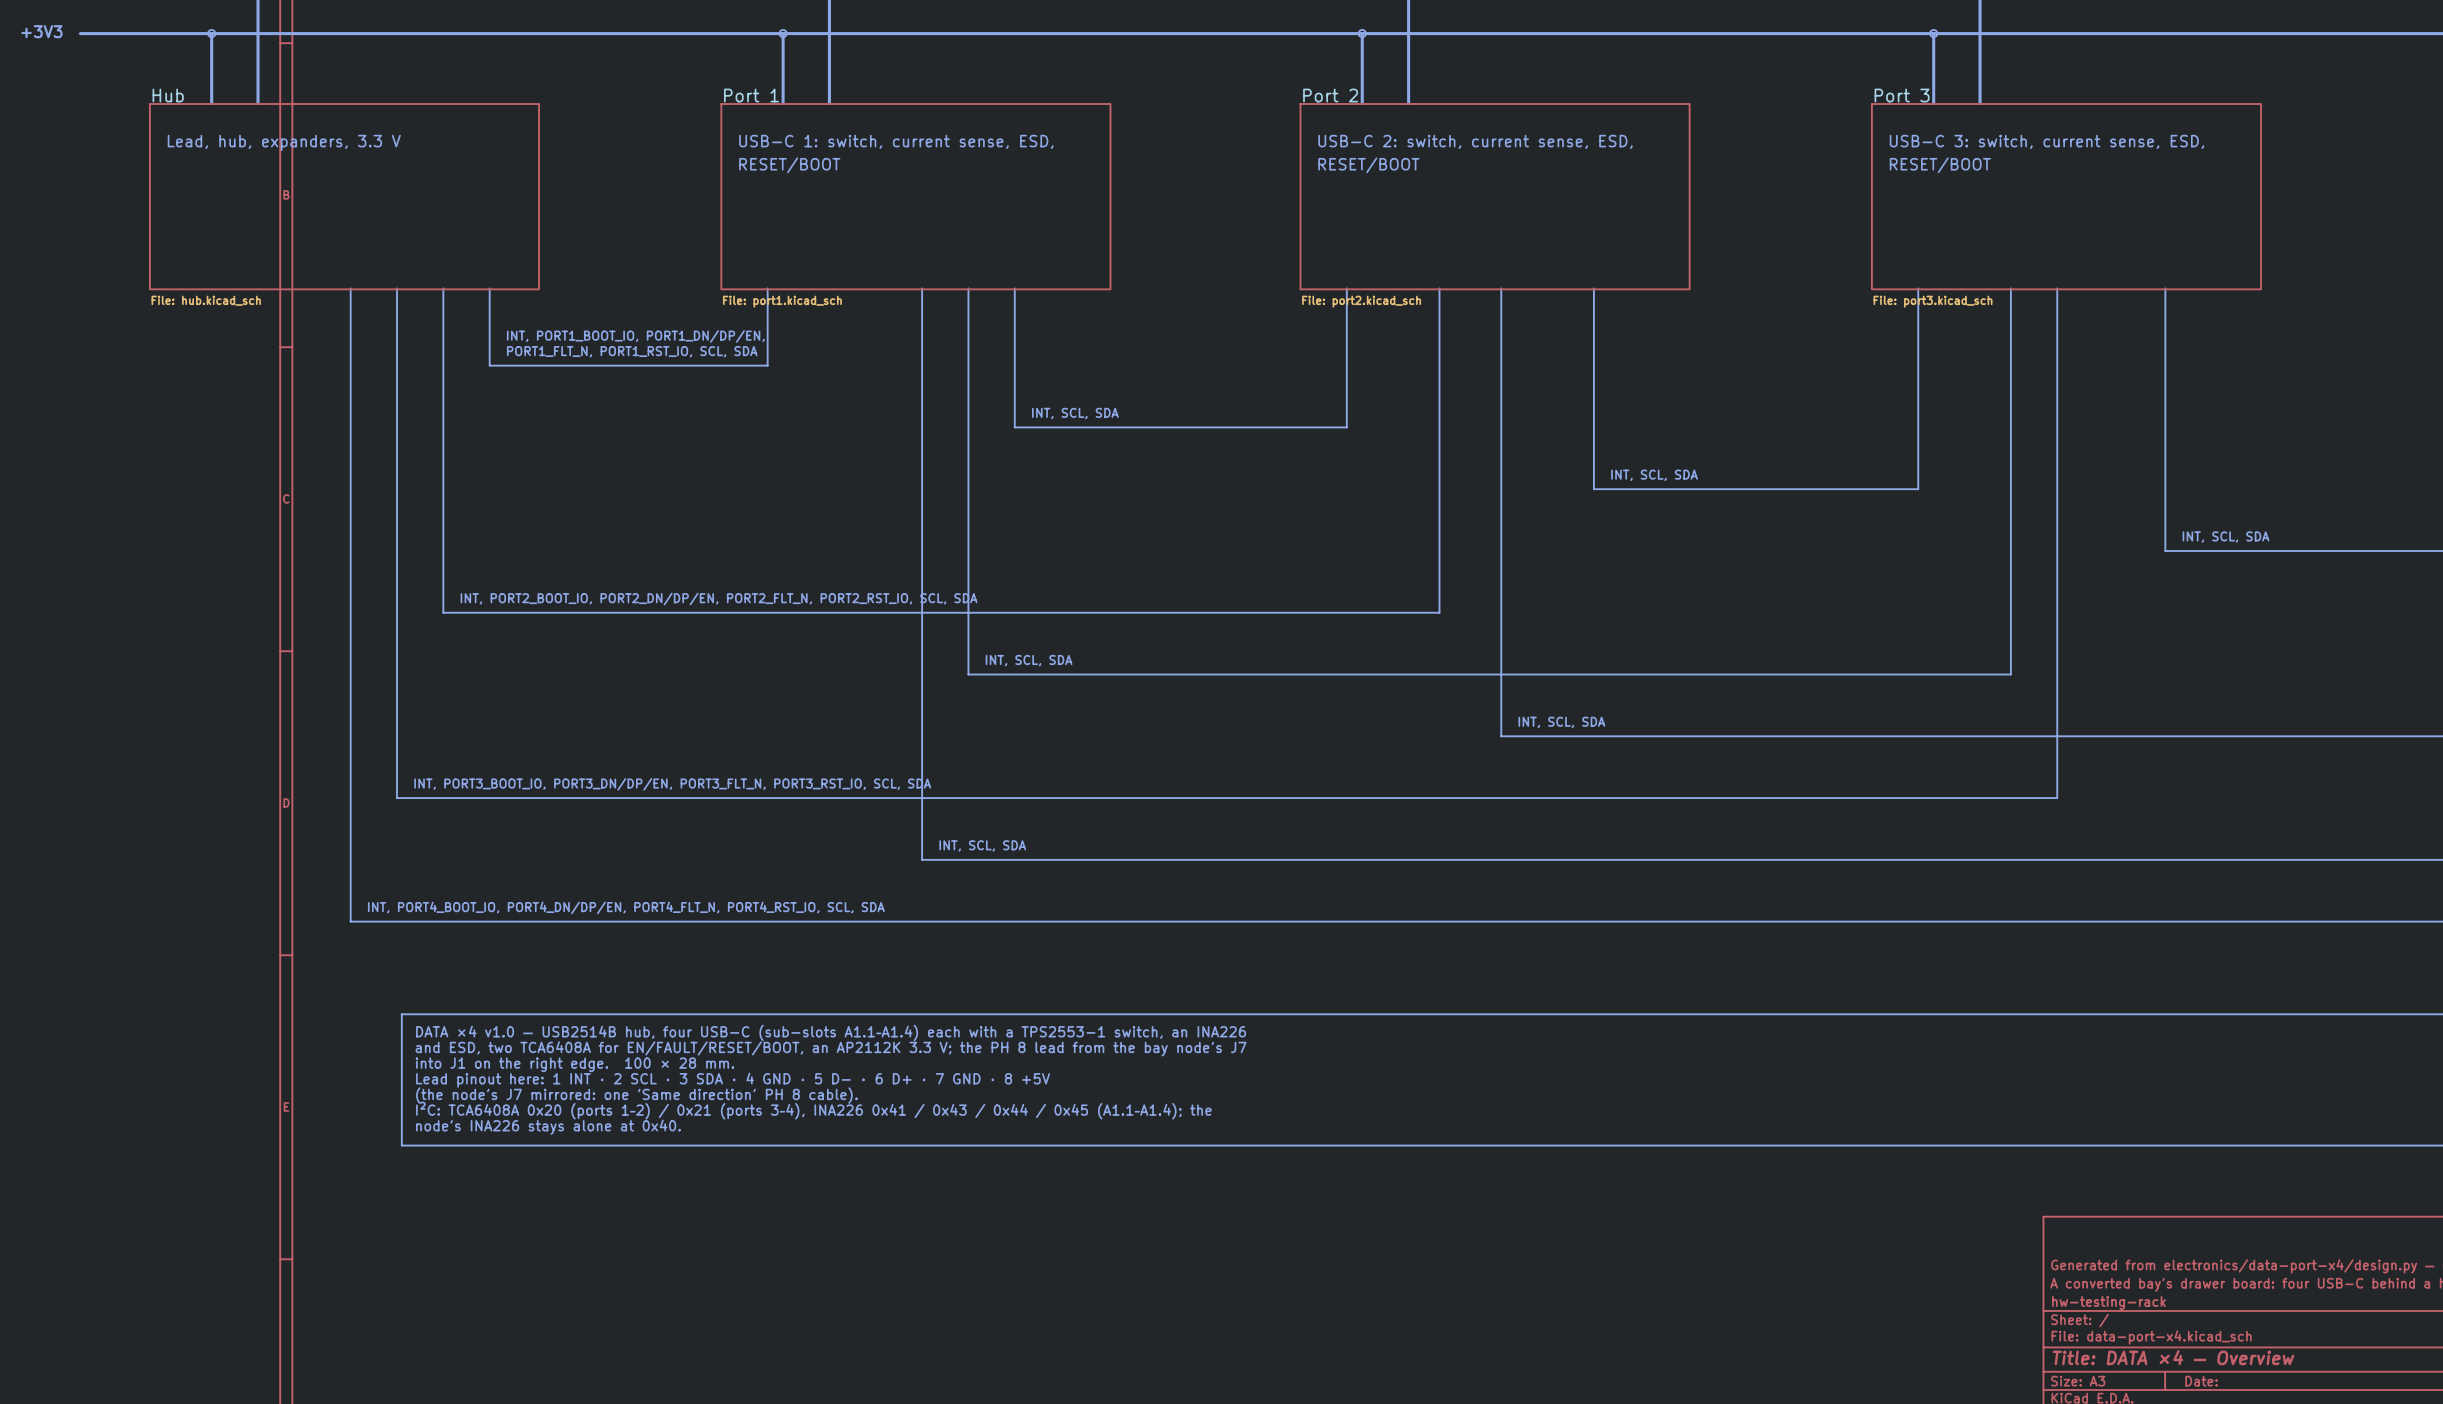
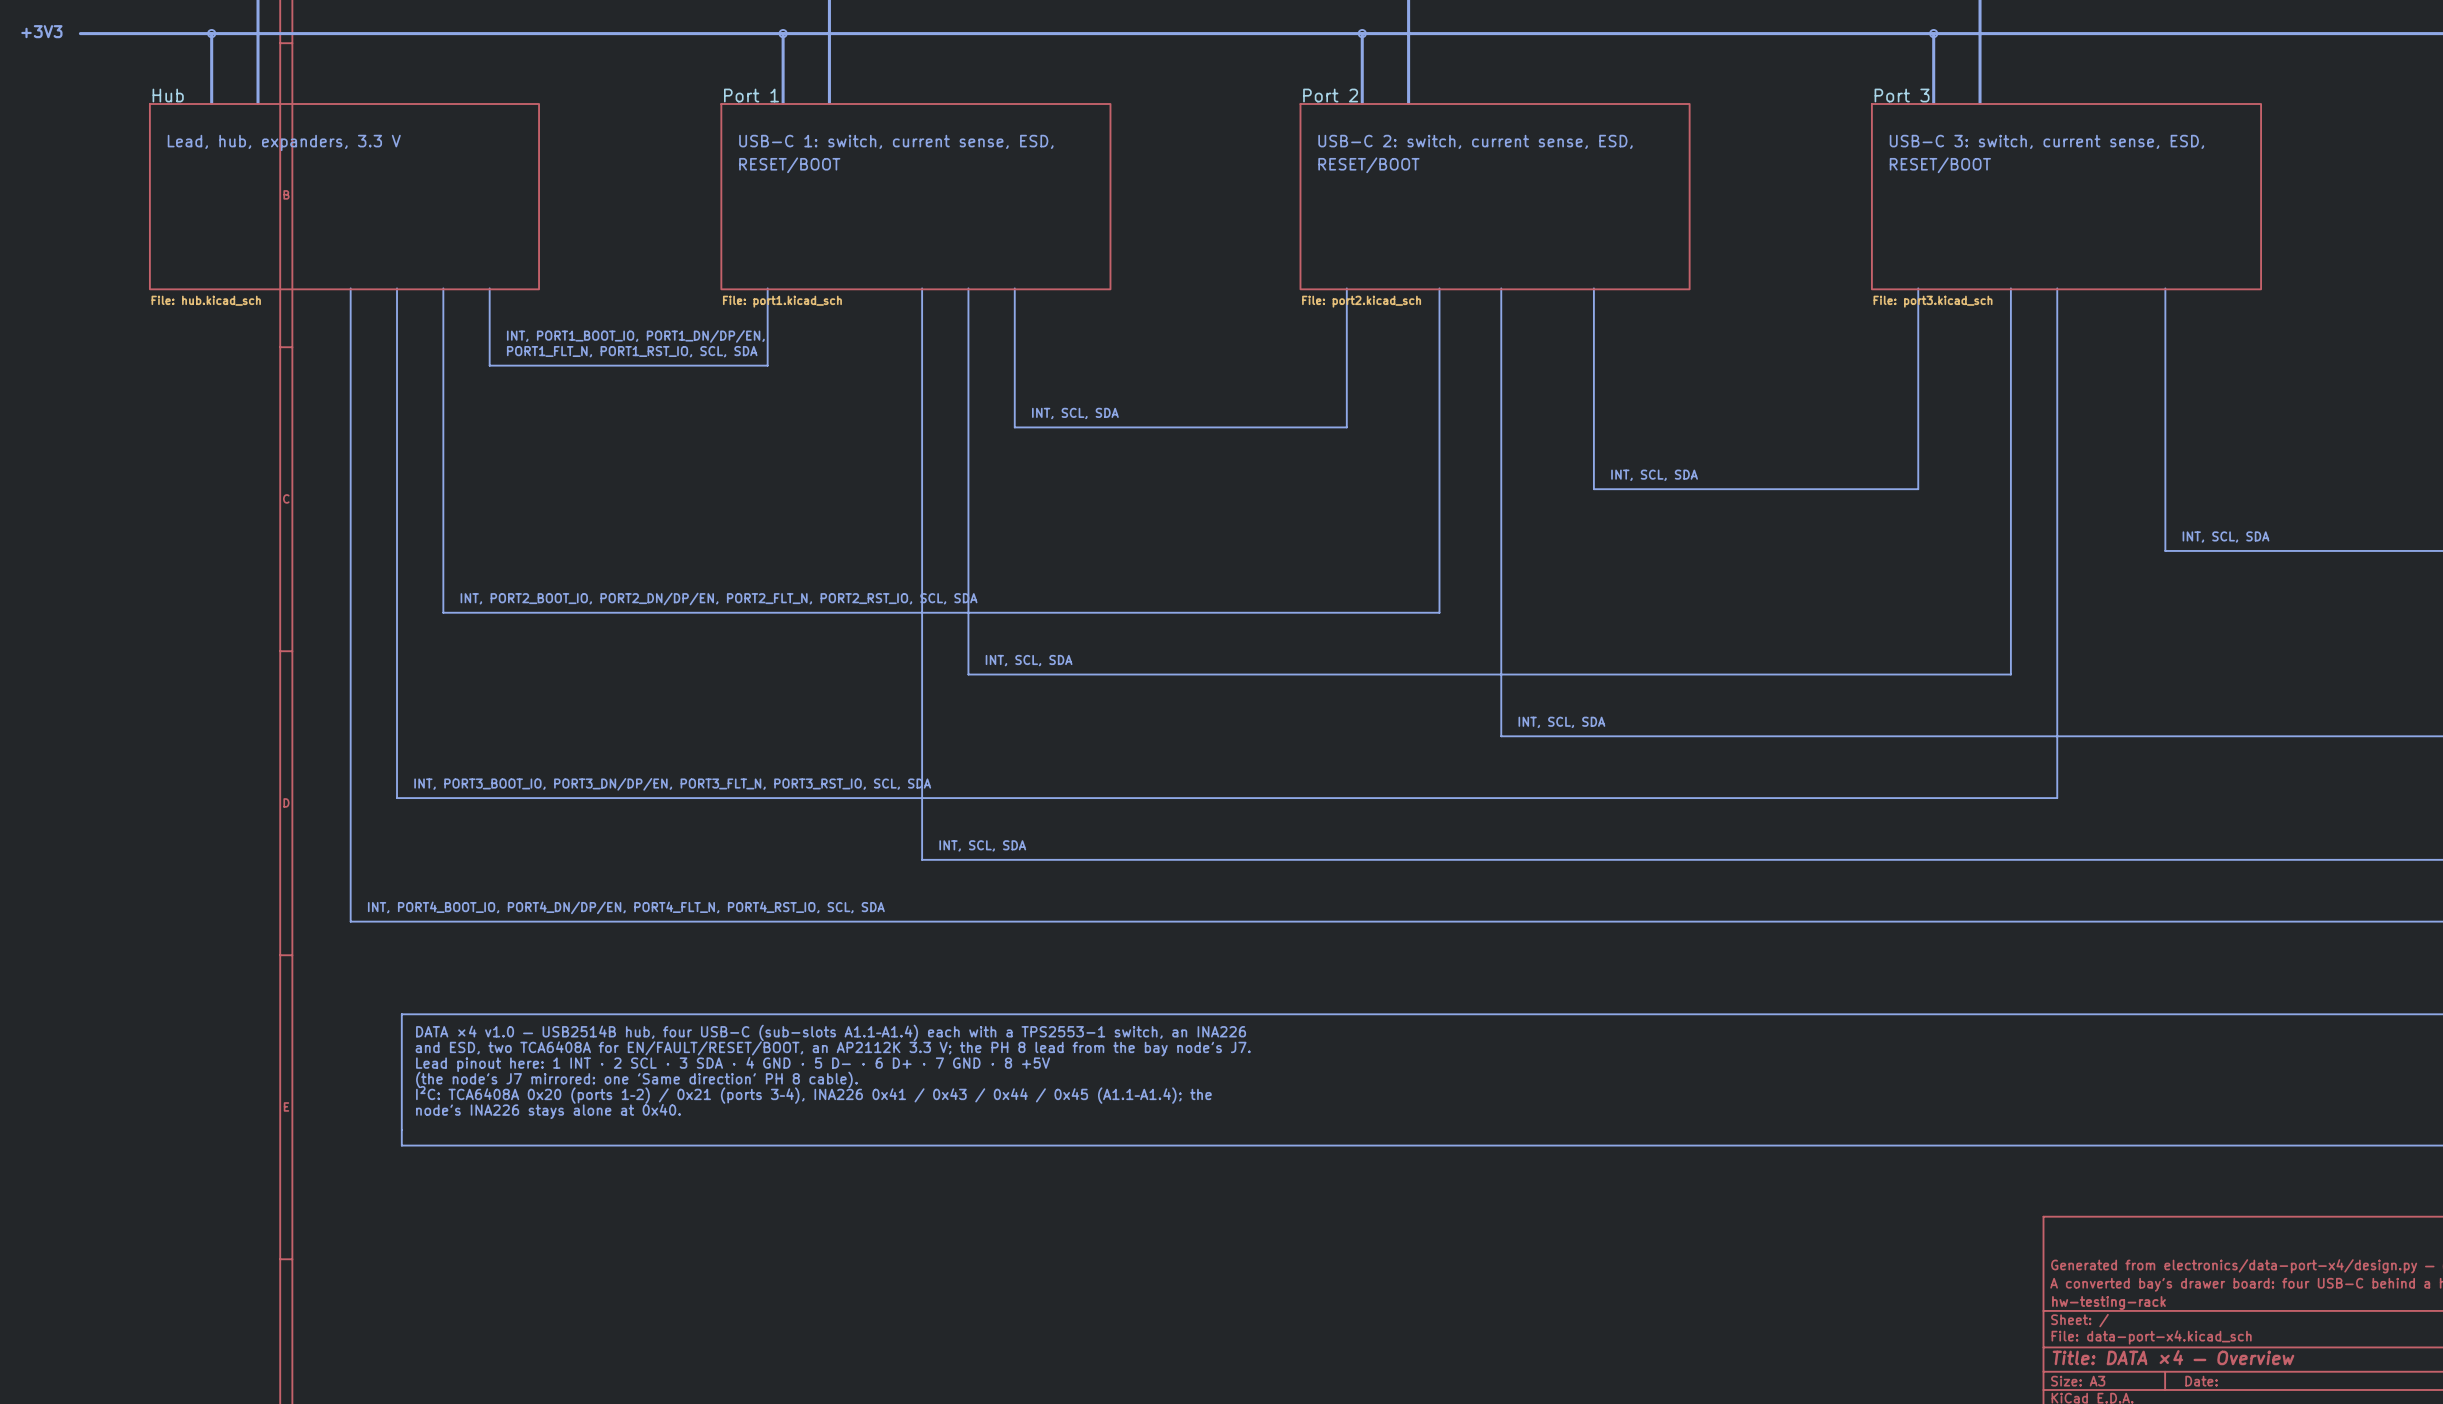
text: and ESD, two TCA6408A for EN/FAULT/RESET/BOOT, an AP2112K 3.3 V; the PH 8 lead from the bay node's J7 (831, 1048) -> and ESD, two TCA6408A for EN/FAULT/RESET/BOOT, an AP2112K 3.3 V; the PH 8 lead from the bay node's J7. (833, 1048)
text: into J1 on the right edge. 100 × 28 mm. (574, 1064) -> Lead pinout here: 1 INT · 2 SCL · 3 SDA · 4 GND · 5 D− · 6 D+ · 7 GND · 8 +5V (733, 1064)
text: Lead pinout here: 1 INT · 2 SCL · 3 SDA · 4 GND · 5 D− · 6 D+ · 7 GND · 8 +5V (733, 1080) -> (the node's J7 mirrored: one 'Same direction' PH 8 cable). (636, 1079)
text: (the node's J7 mirrored: one 'Same direction' PH 8 cable). (636, 1095) -> I²C: TCA6408A 0x20 (ports 1–2) / 0x21 (ports 3–4), INA226 0x41 / 0x43 / 0x44 / 0x45 (A1.1–A1.4); the (813, 1094)
text: I²C: TCA6408A 0x20 (ports 1–2) / 0x21 (ports 3–4), INA226 0x41 / 0x43 / 0x44 / 0x45 (A1.1–A1.4); the (813, 1110) -> node's INA226 stays alone at 0x40. (548, 1111)
text: node's INA226 stays alone at 0x40. (548, 1127) -> none

